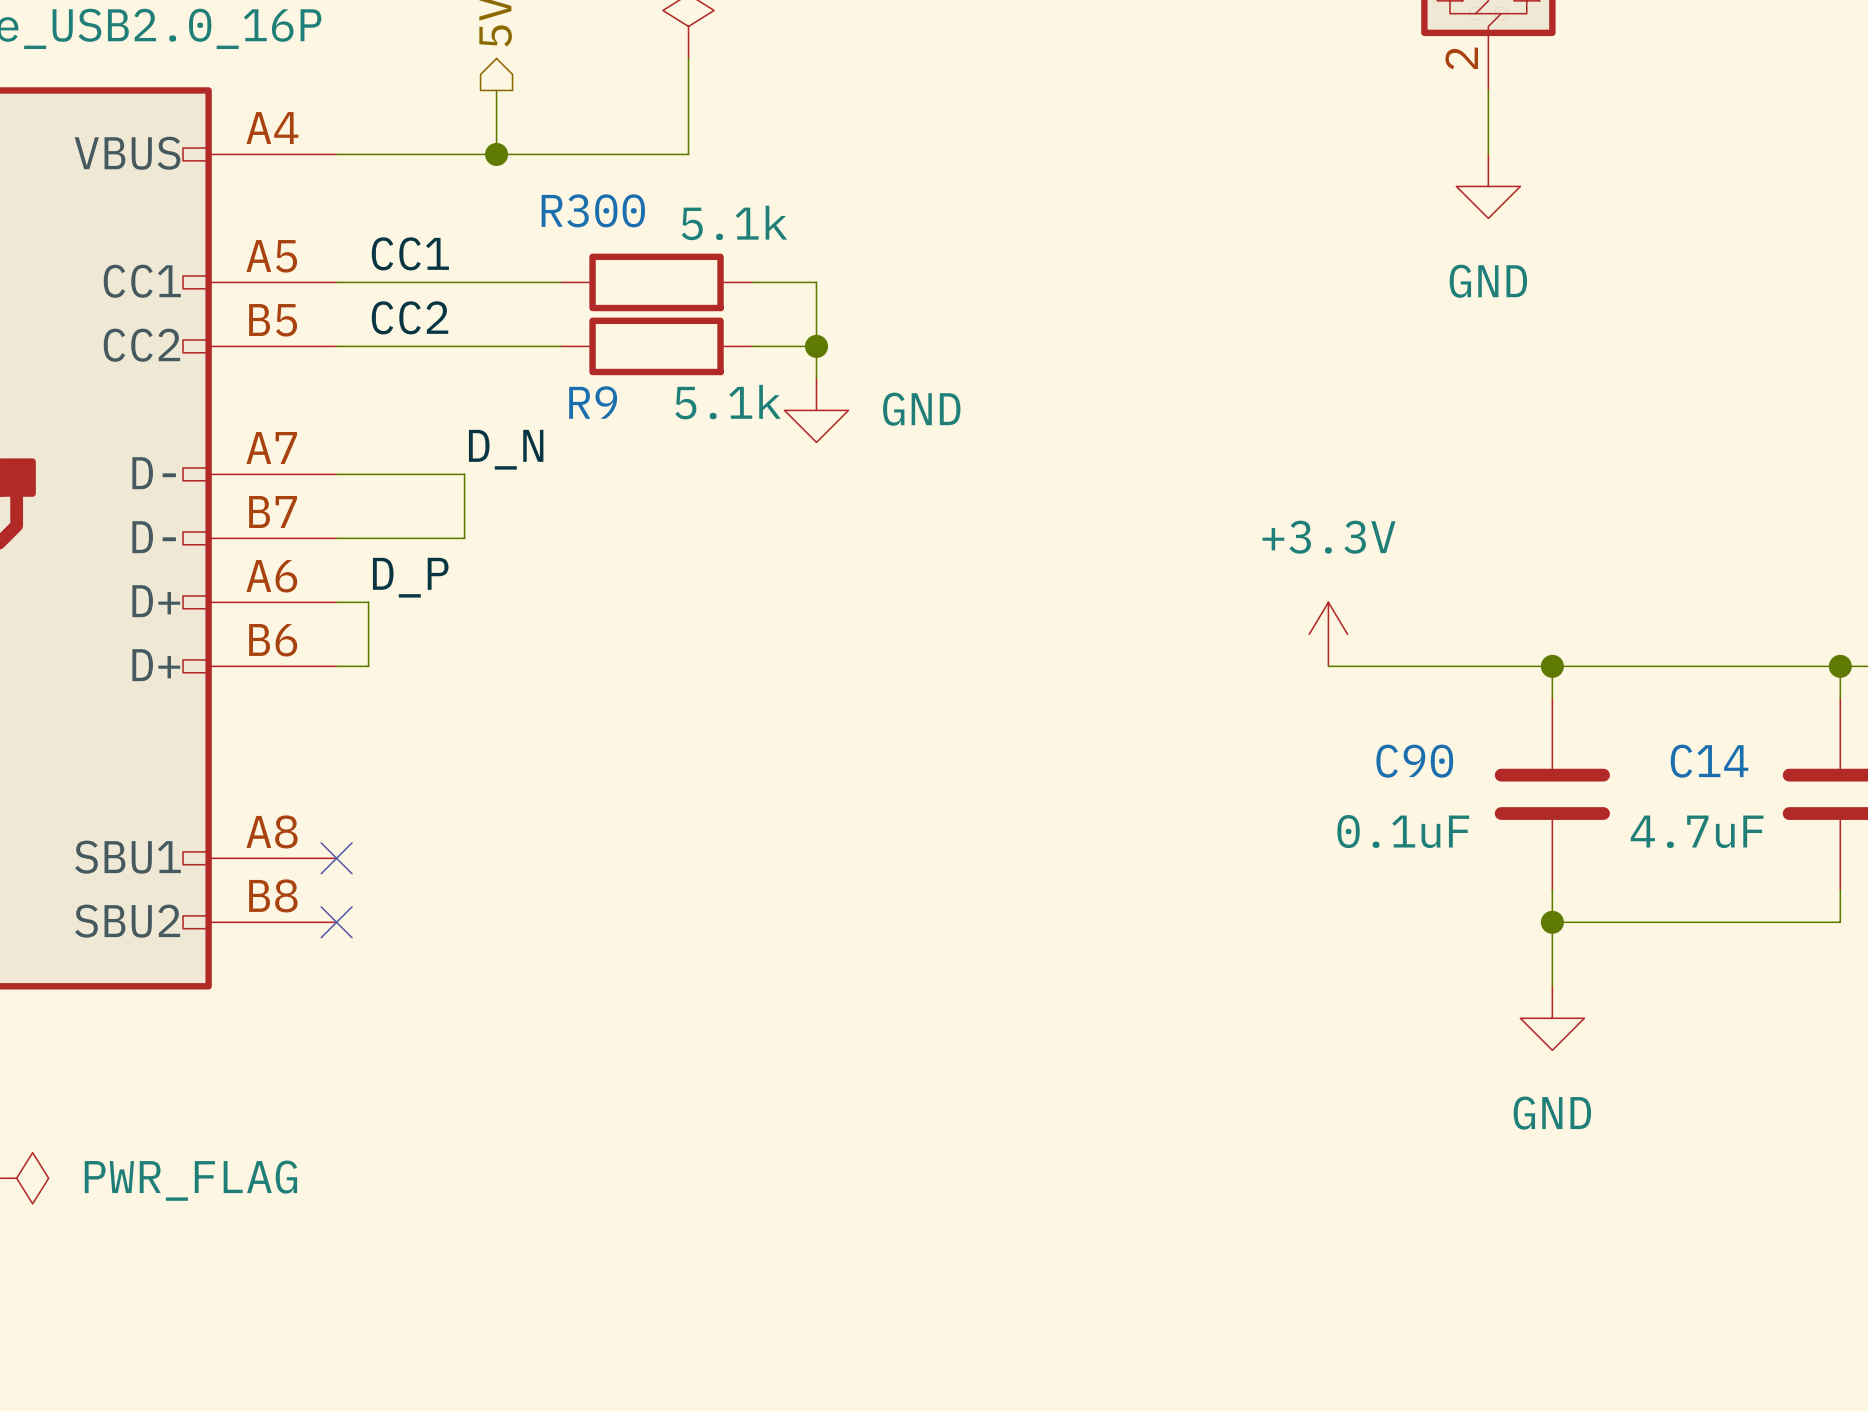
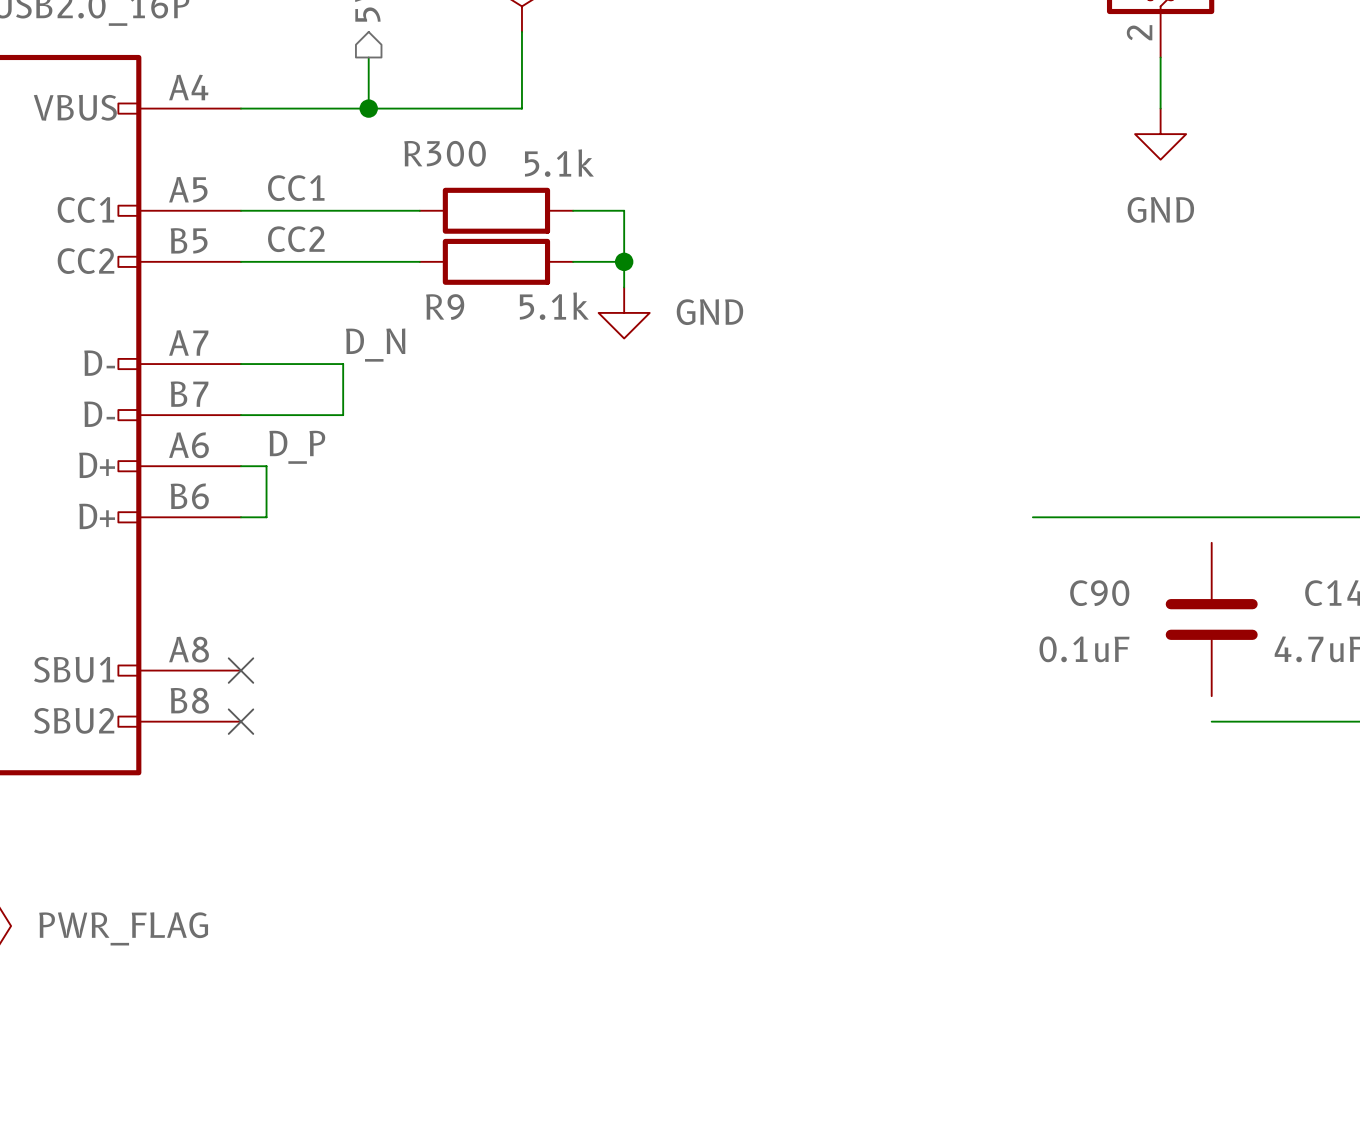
power symbol: +3.3V (1328, 634) -> none
wire: (1552, 666) (1552, 698) -> none
junction: (1552, 666) -> none
wire: (1552, 890) (1552, 986) -> none
junction: (1552, 922) -> none
power symbol: GND (1552, 1018) -> none

